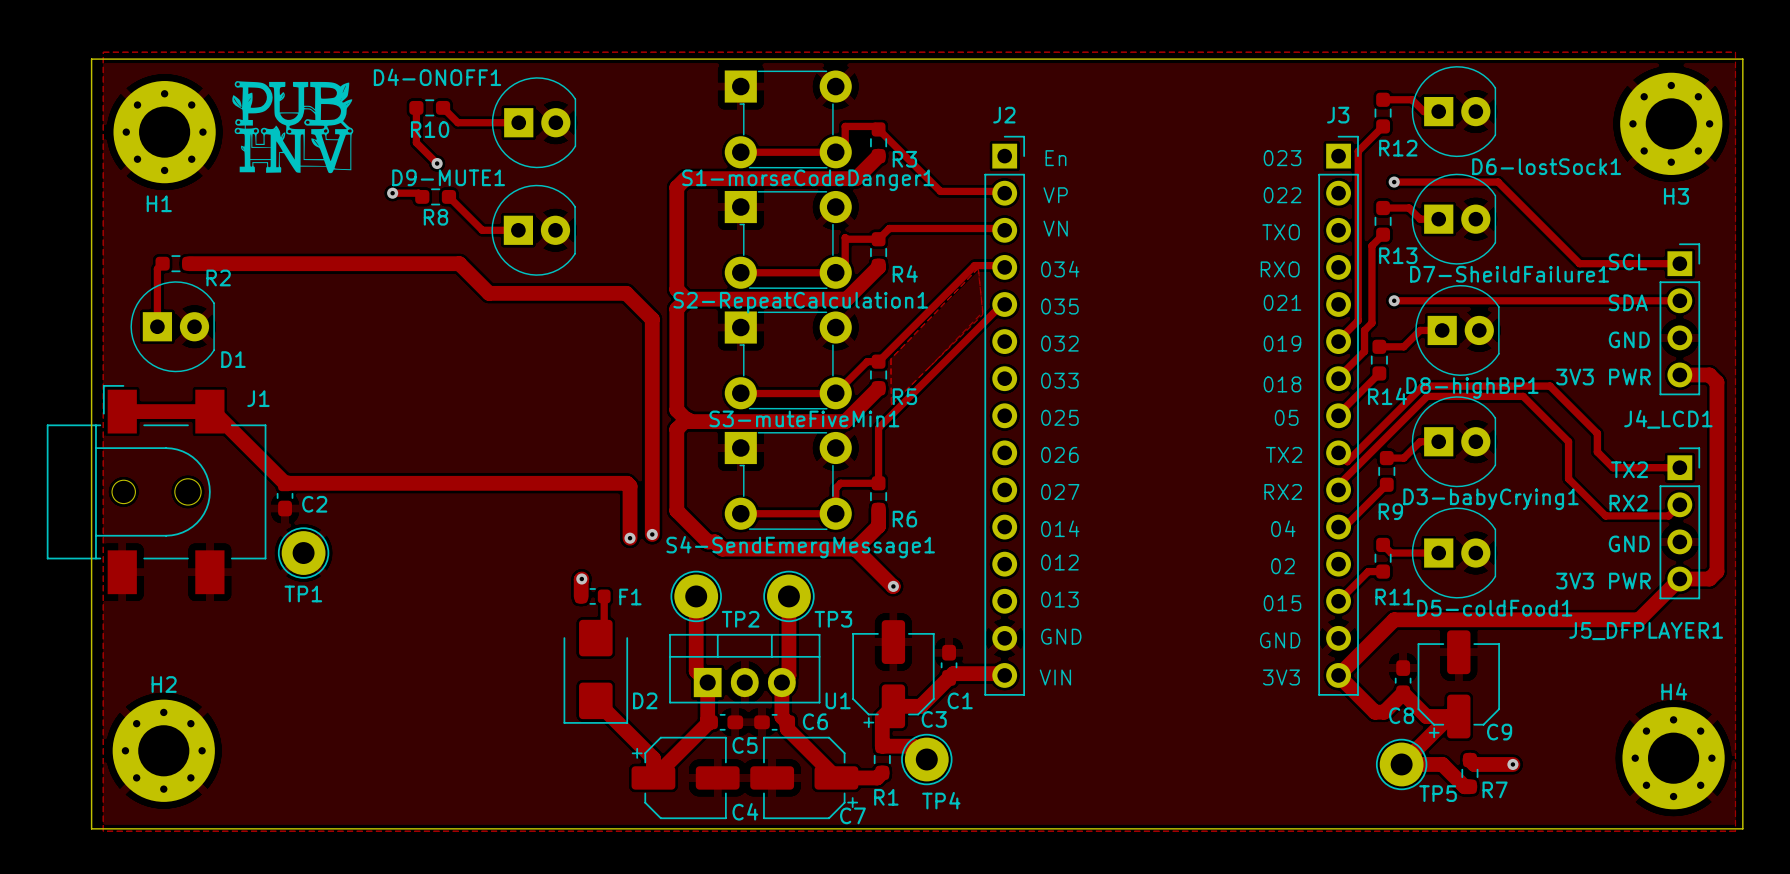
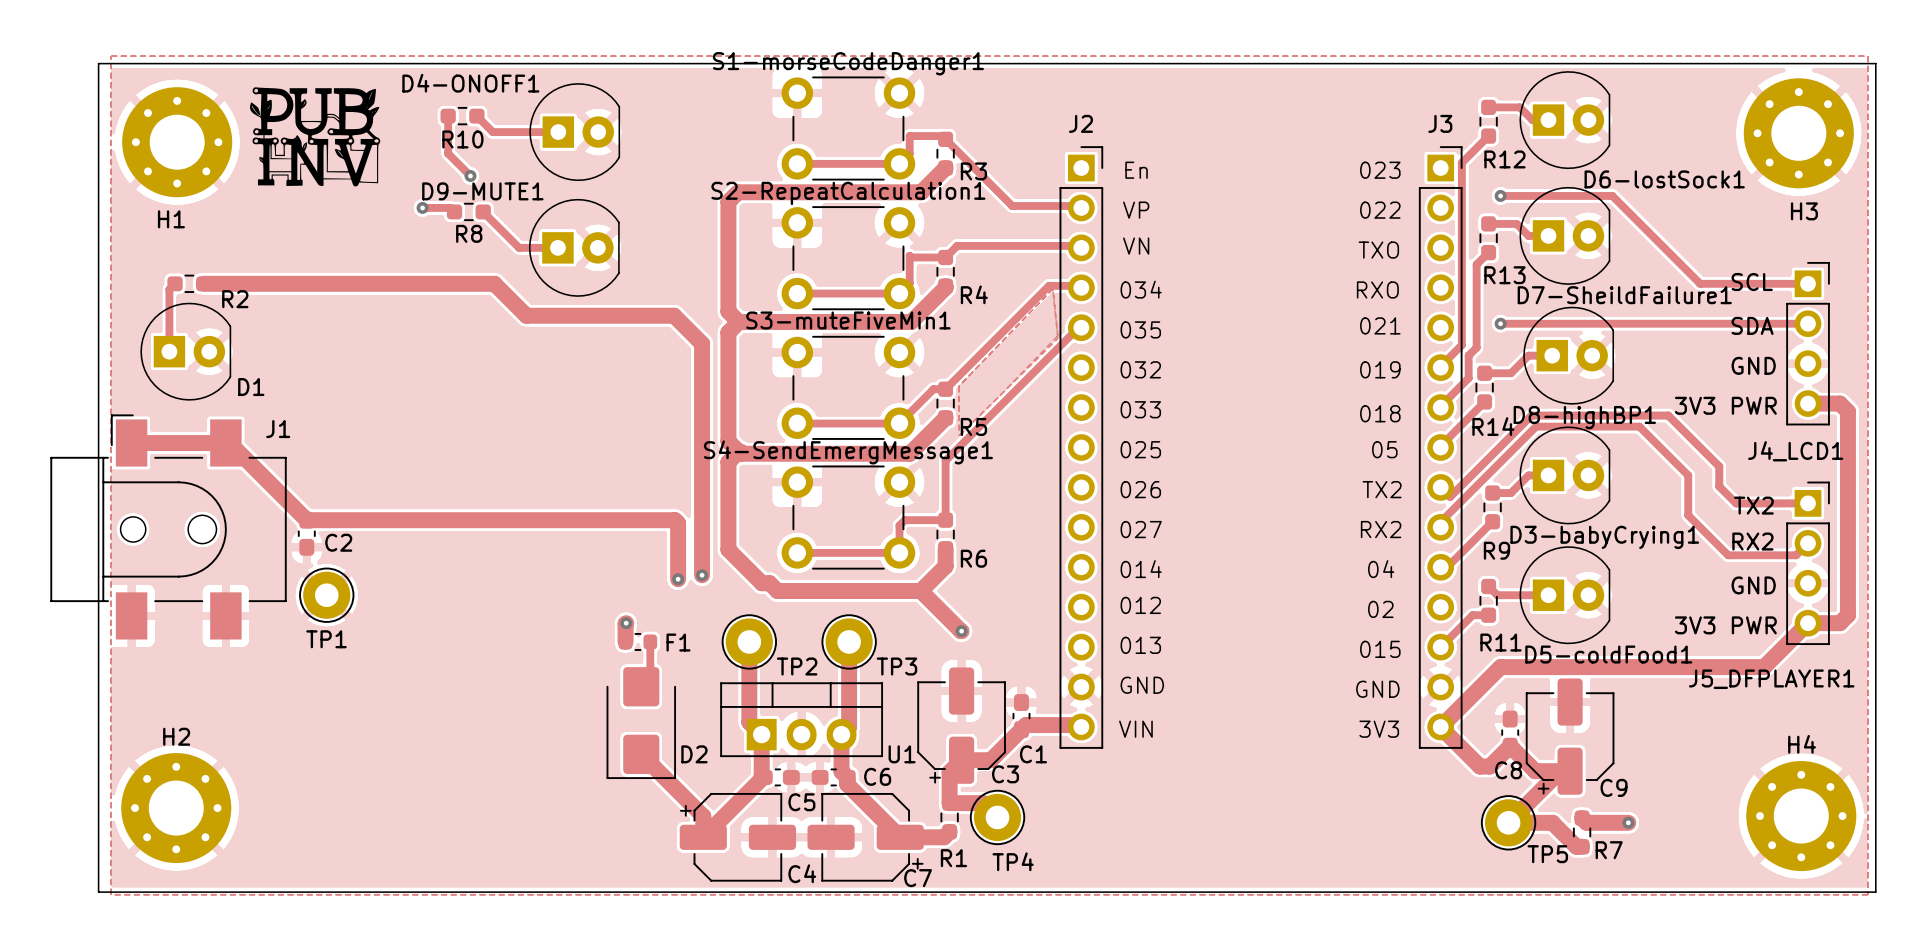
S1-morseCodeDanger1 footprint: [724, 70, 852, 169] -> [781, 76, 916, 181]
S1-morseCodeDanger1 name position: S1-morseCodeDanger1 (808, 180) -> S1-morseCodeDanger1 (848, 63)
S2-RepeatCalculation1 footprint: [724, 190, 852, 289] -> [781, 206, 916, 311]
S2-RepeatCalculation1 name position: S2-RepeatCalculation1 (800, 302) -> S2-RepeatCalculation1 (848, 193)
S3-muteFiveMin1 footprint: [724, 311, 852, 410] -> [781, 335, 916, 440]
S3-muteFiveMin1 name position: S3-muteFiveMin1 (804, 418) -> S3-muteFiveMin1 (848, 320)
S4-SendEmergMessage1 footprint: [724, 431, 852, 530] -> [781, 465, 916, 570]
S4-SendEmergMessage1 name position: S4-SendEmergMessage1 (800, 547) -> S4-SendEmergMessage1 (848, 452)

